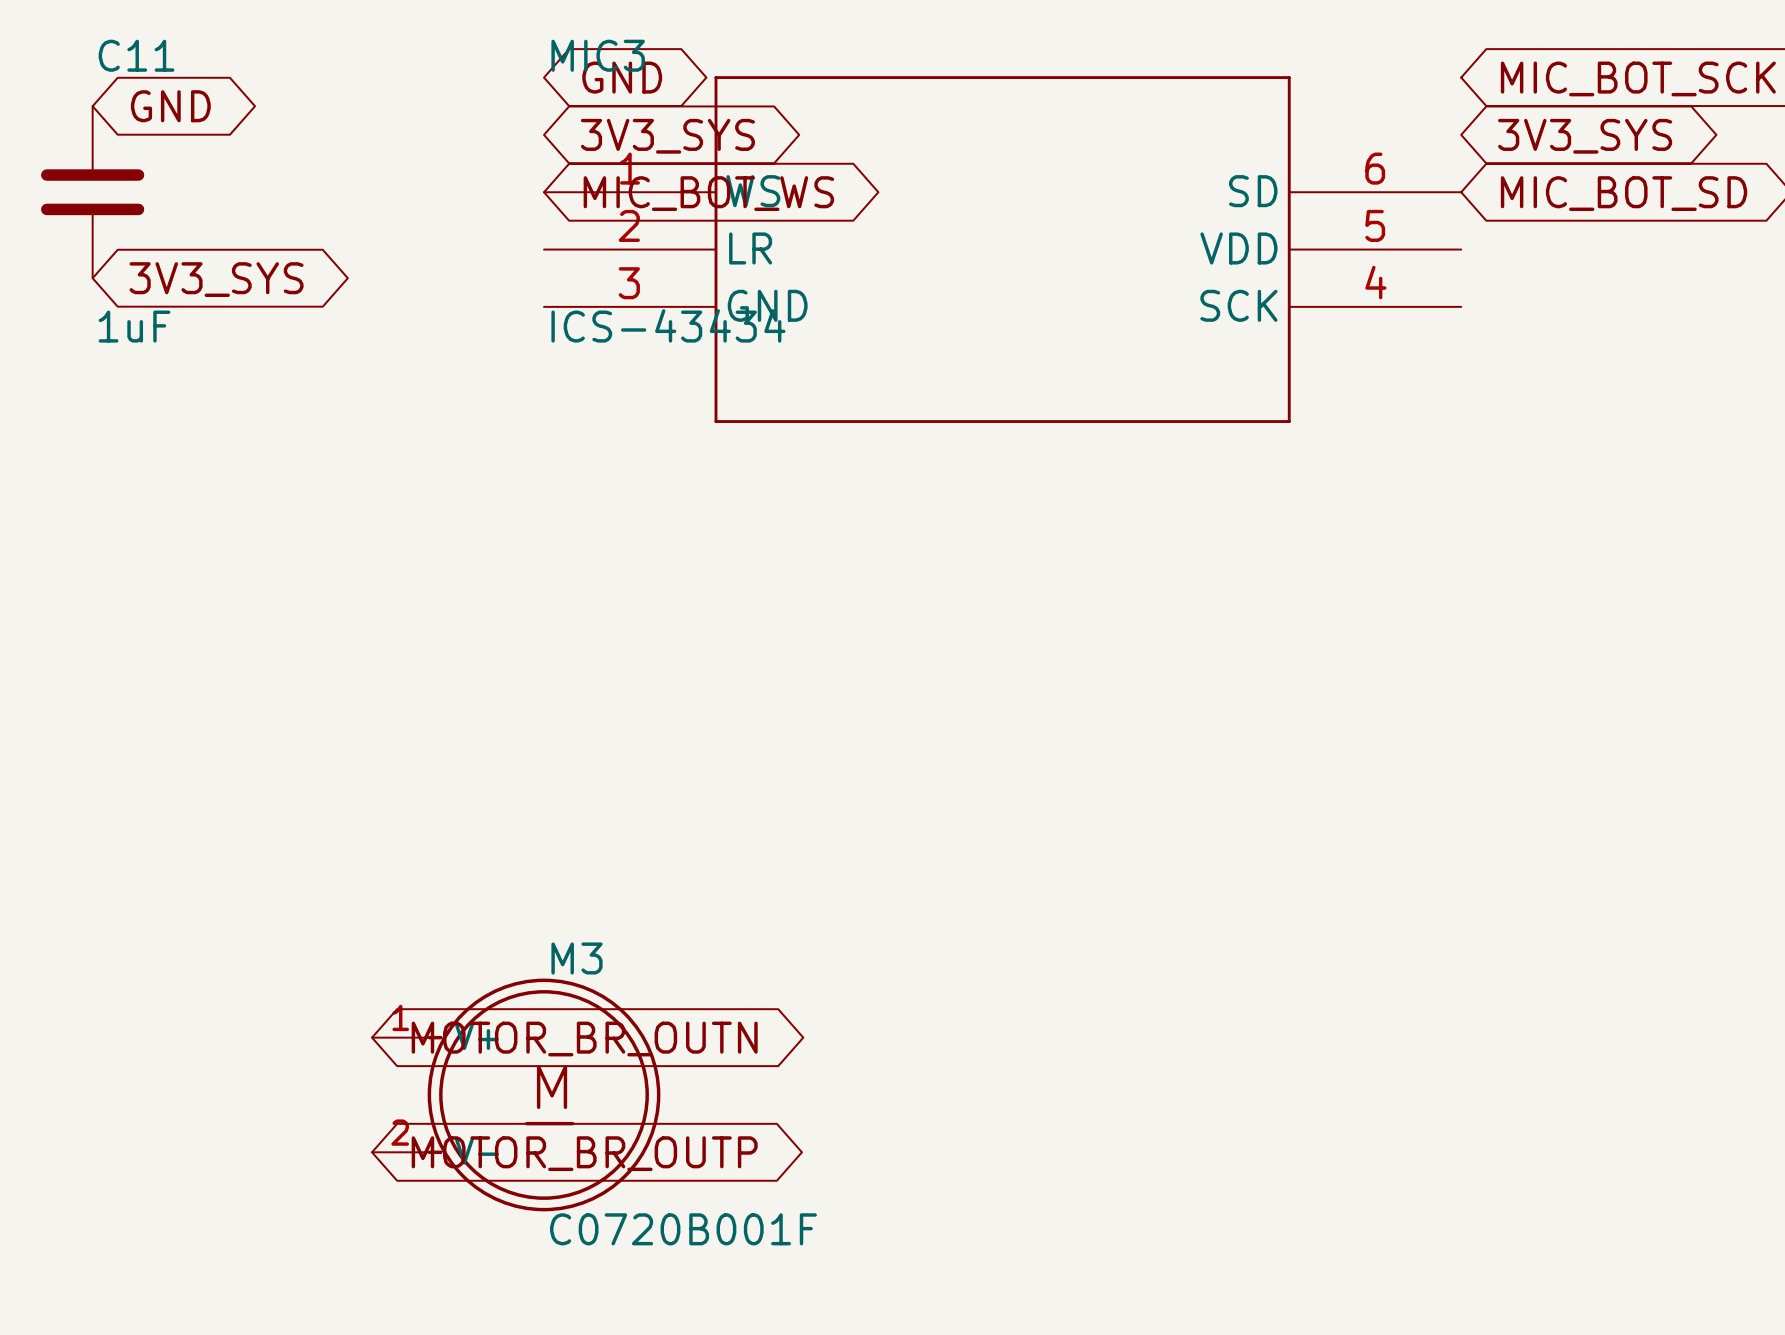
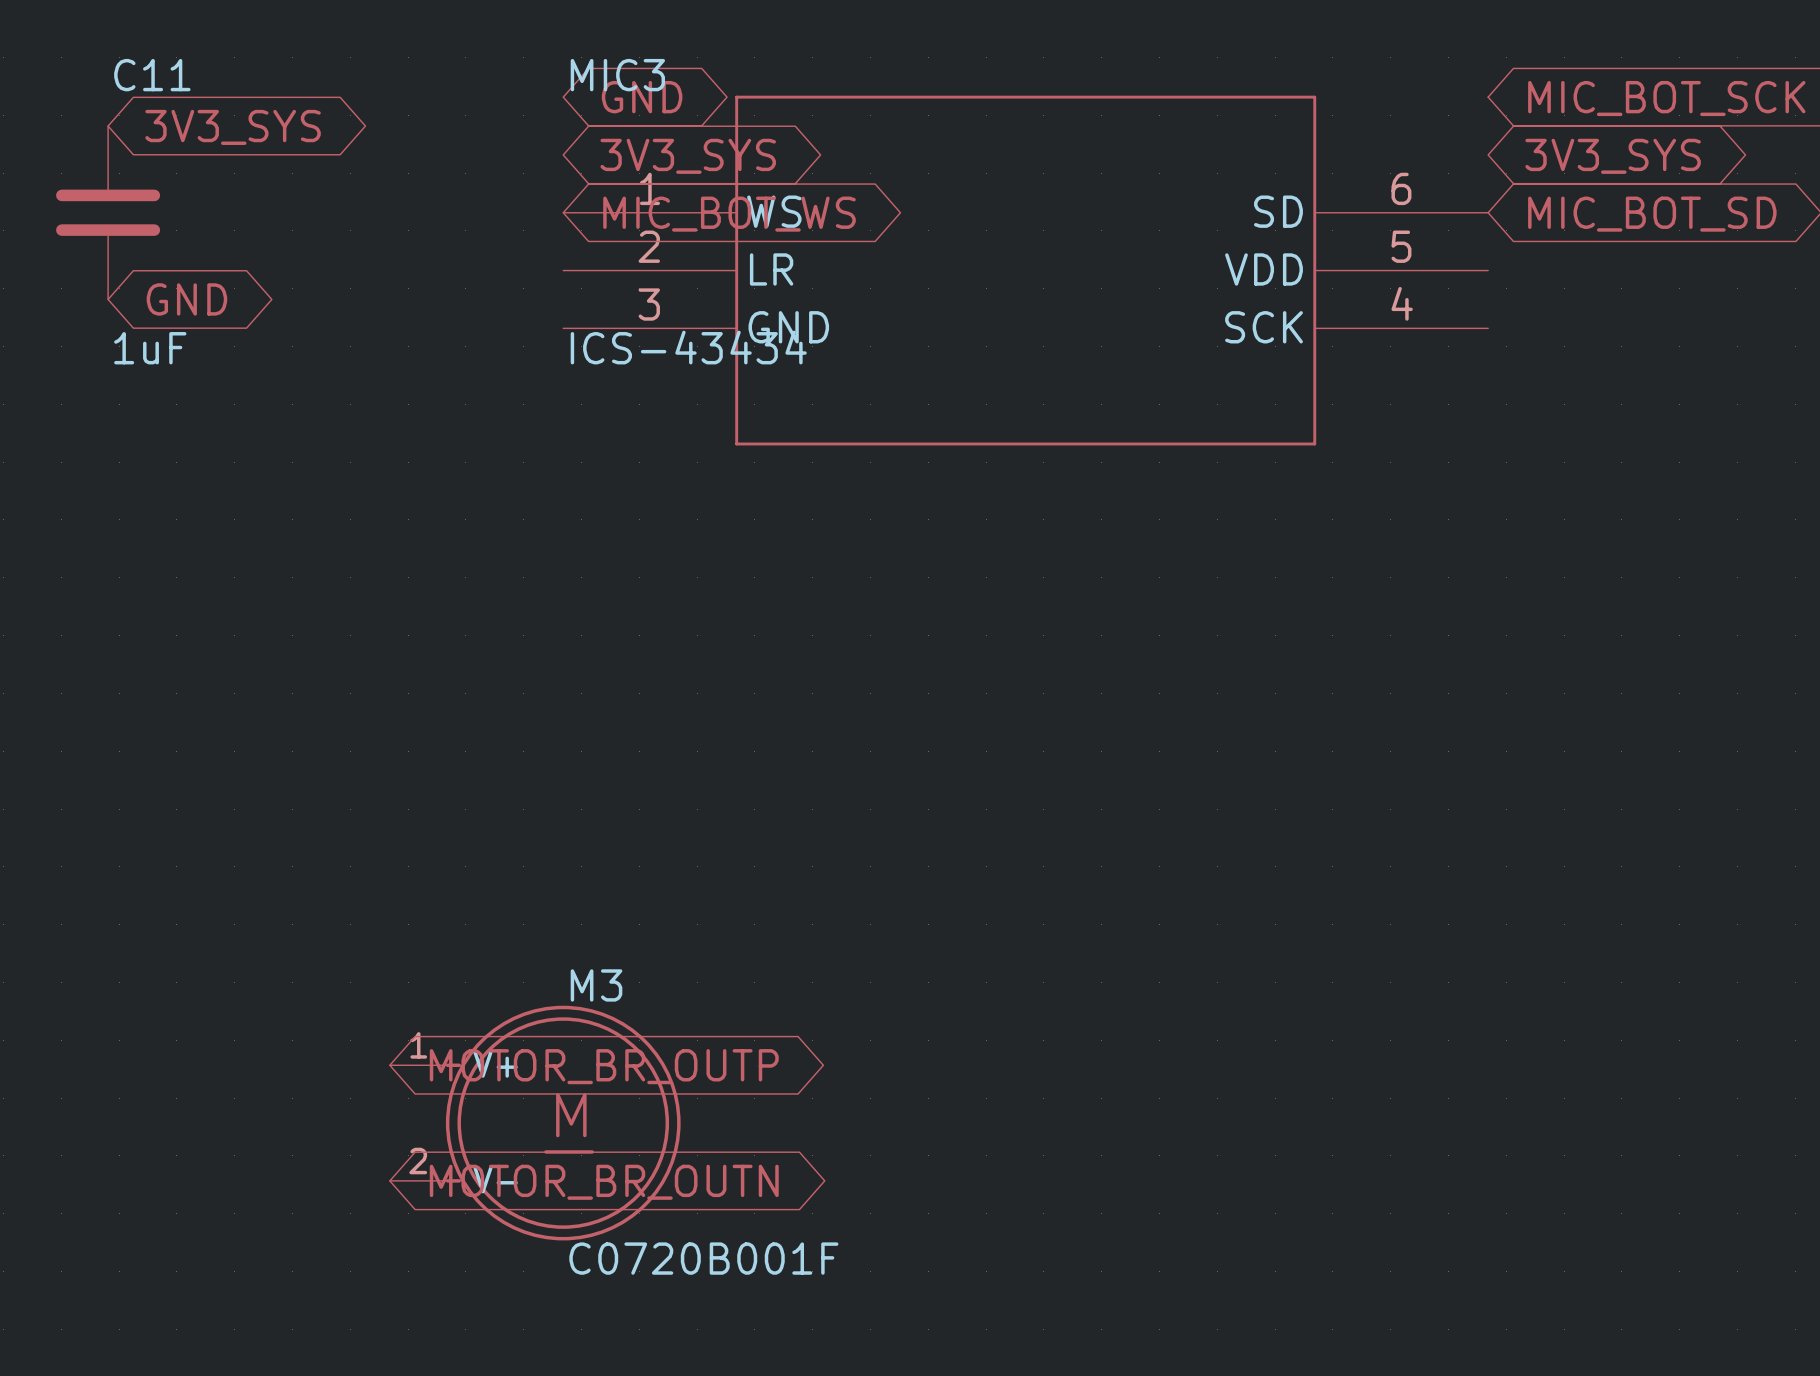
global label: GND (170, 106) -> 3V3_SYS (233, 127)
global label: 3V3_SYS (216, 279) -> GND (186, 299)
global label: MOTOR_BR_OUTN (584, 1039) -> MOTOR_BR_OUTP (604, 1066)
global label: MOTOR_BR_OUTP (584, 1153) -> MOTOR_BR_OUTN (604, 1182)

